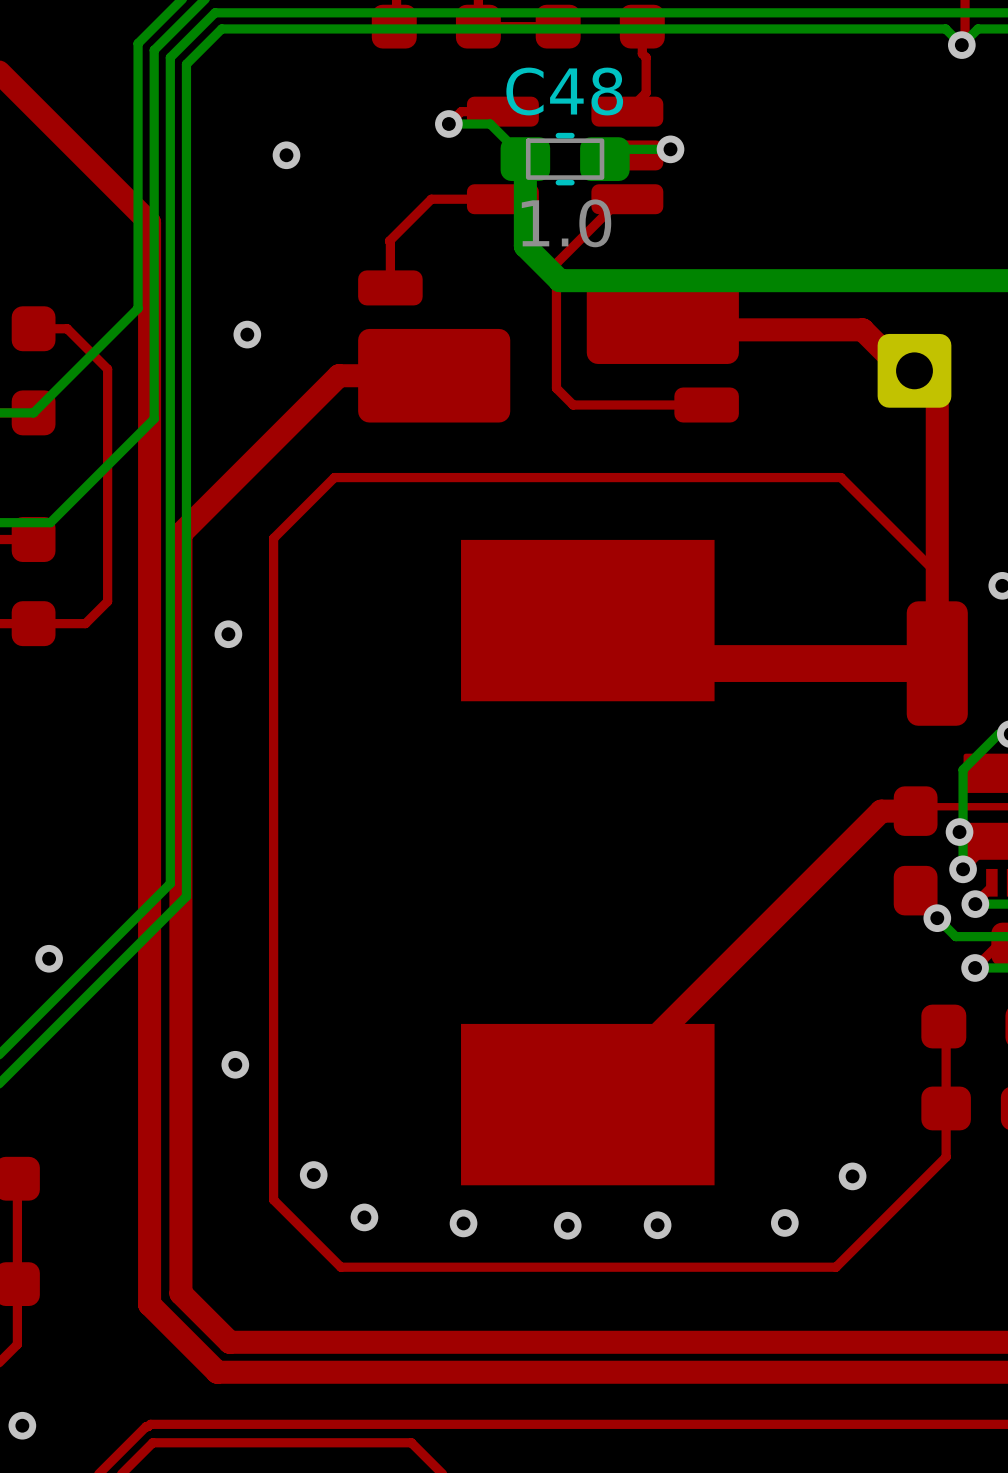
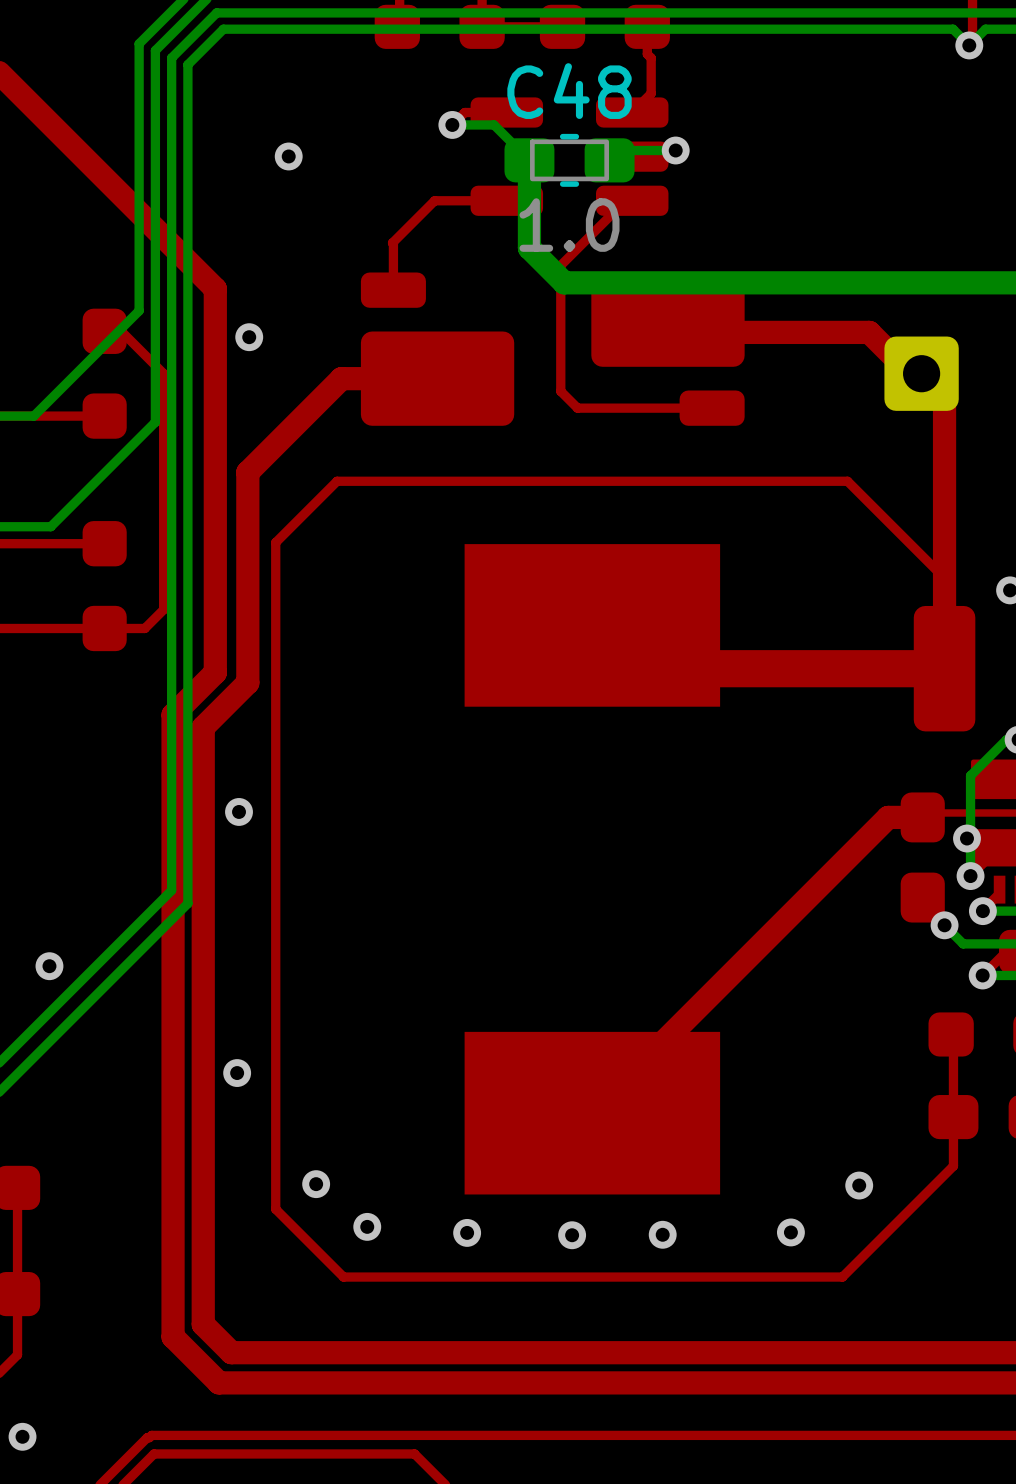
top track: (149, 222) (149, 1304) (171, 1326) -> (150, 224) (215, 288) (215, 672) (173, 714) (173, 1336)
top track: (33, 328) (67, 328) (107, 369) (107, 601) (85, 623) -> (104, 331) (121, 331) (163, 373) (163, 609) (144, 628) (86, 628)
part position: (33, 370) -> (104, 373)
top track: none -> (104, 416) (33, 416)
top track: (245, 468) (180, 533) (180, 1293) (201, 1314) -> (247, 472) (247, 682) (203, 727) (203, 1324)
top track: none -> (104, 543) (33, 543)
part position: (33, 581) -> (104, 586)
via position: (228, 634) -> (239, 811)

